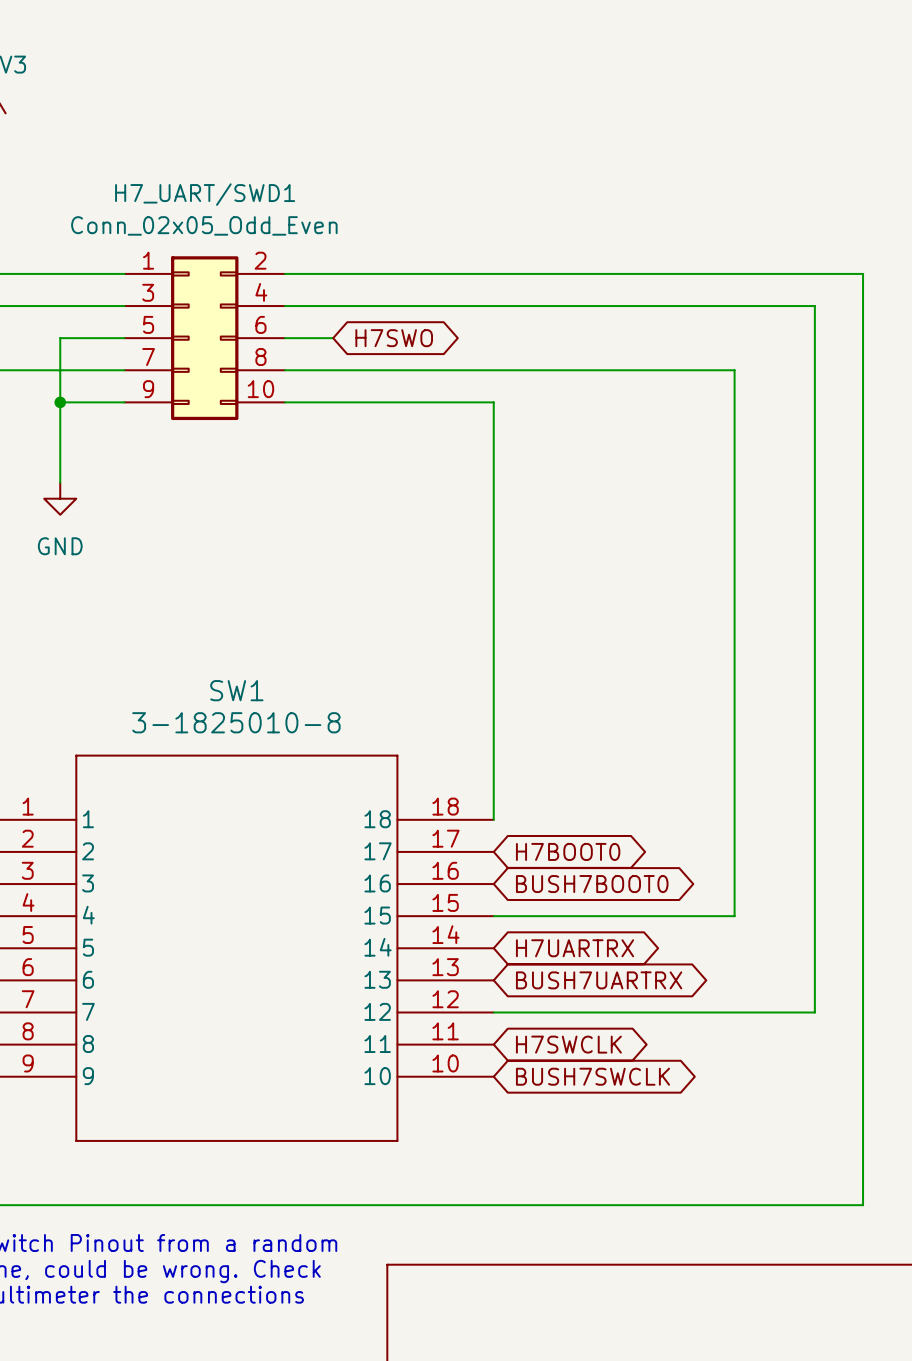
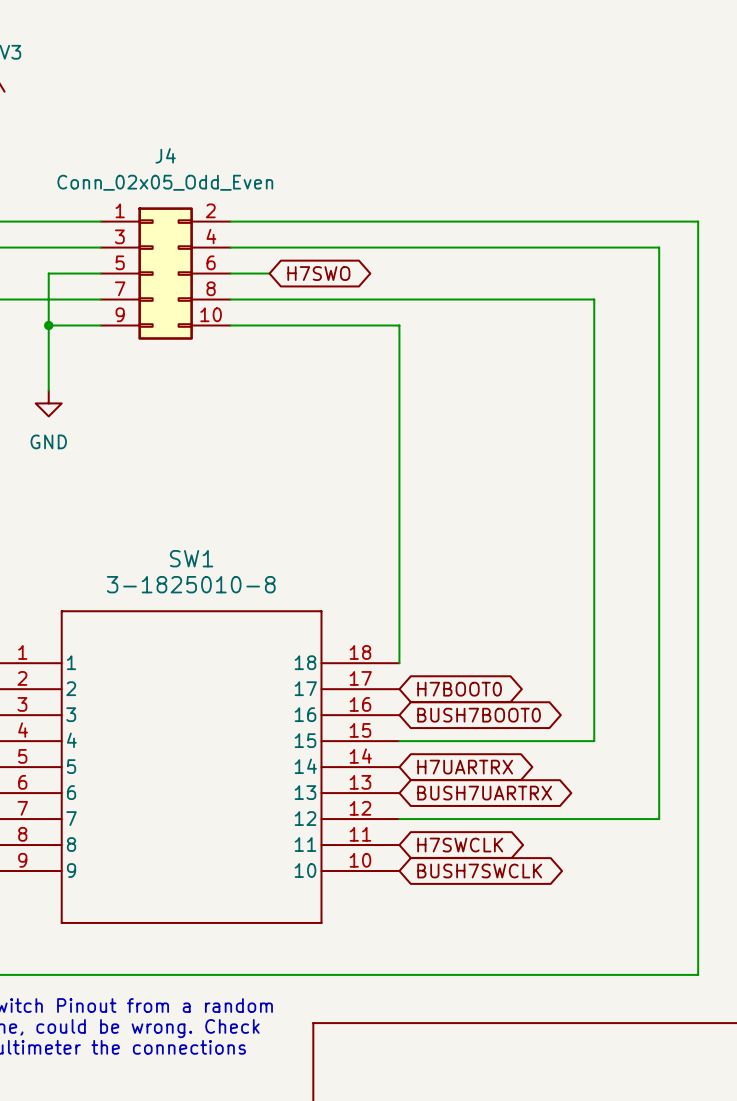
H7_UART/SWD1 name: H7_UART/SWD1 (205, 194) -> J4 (165, 155)

